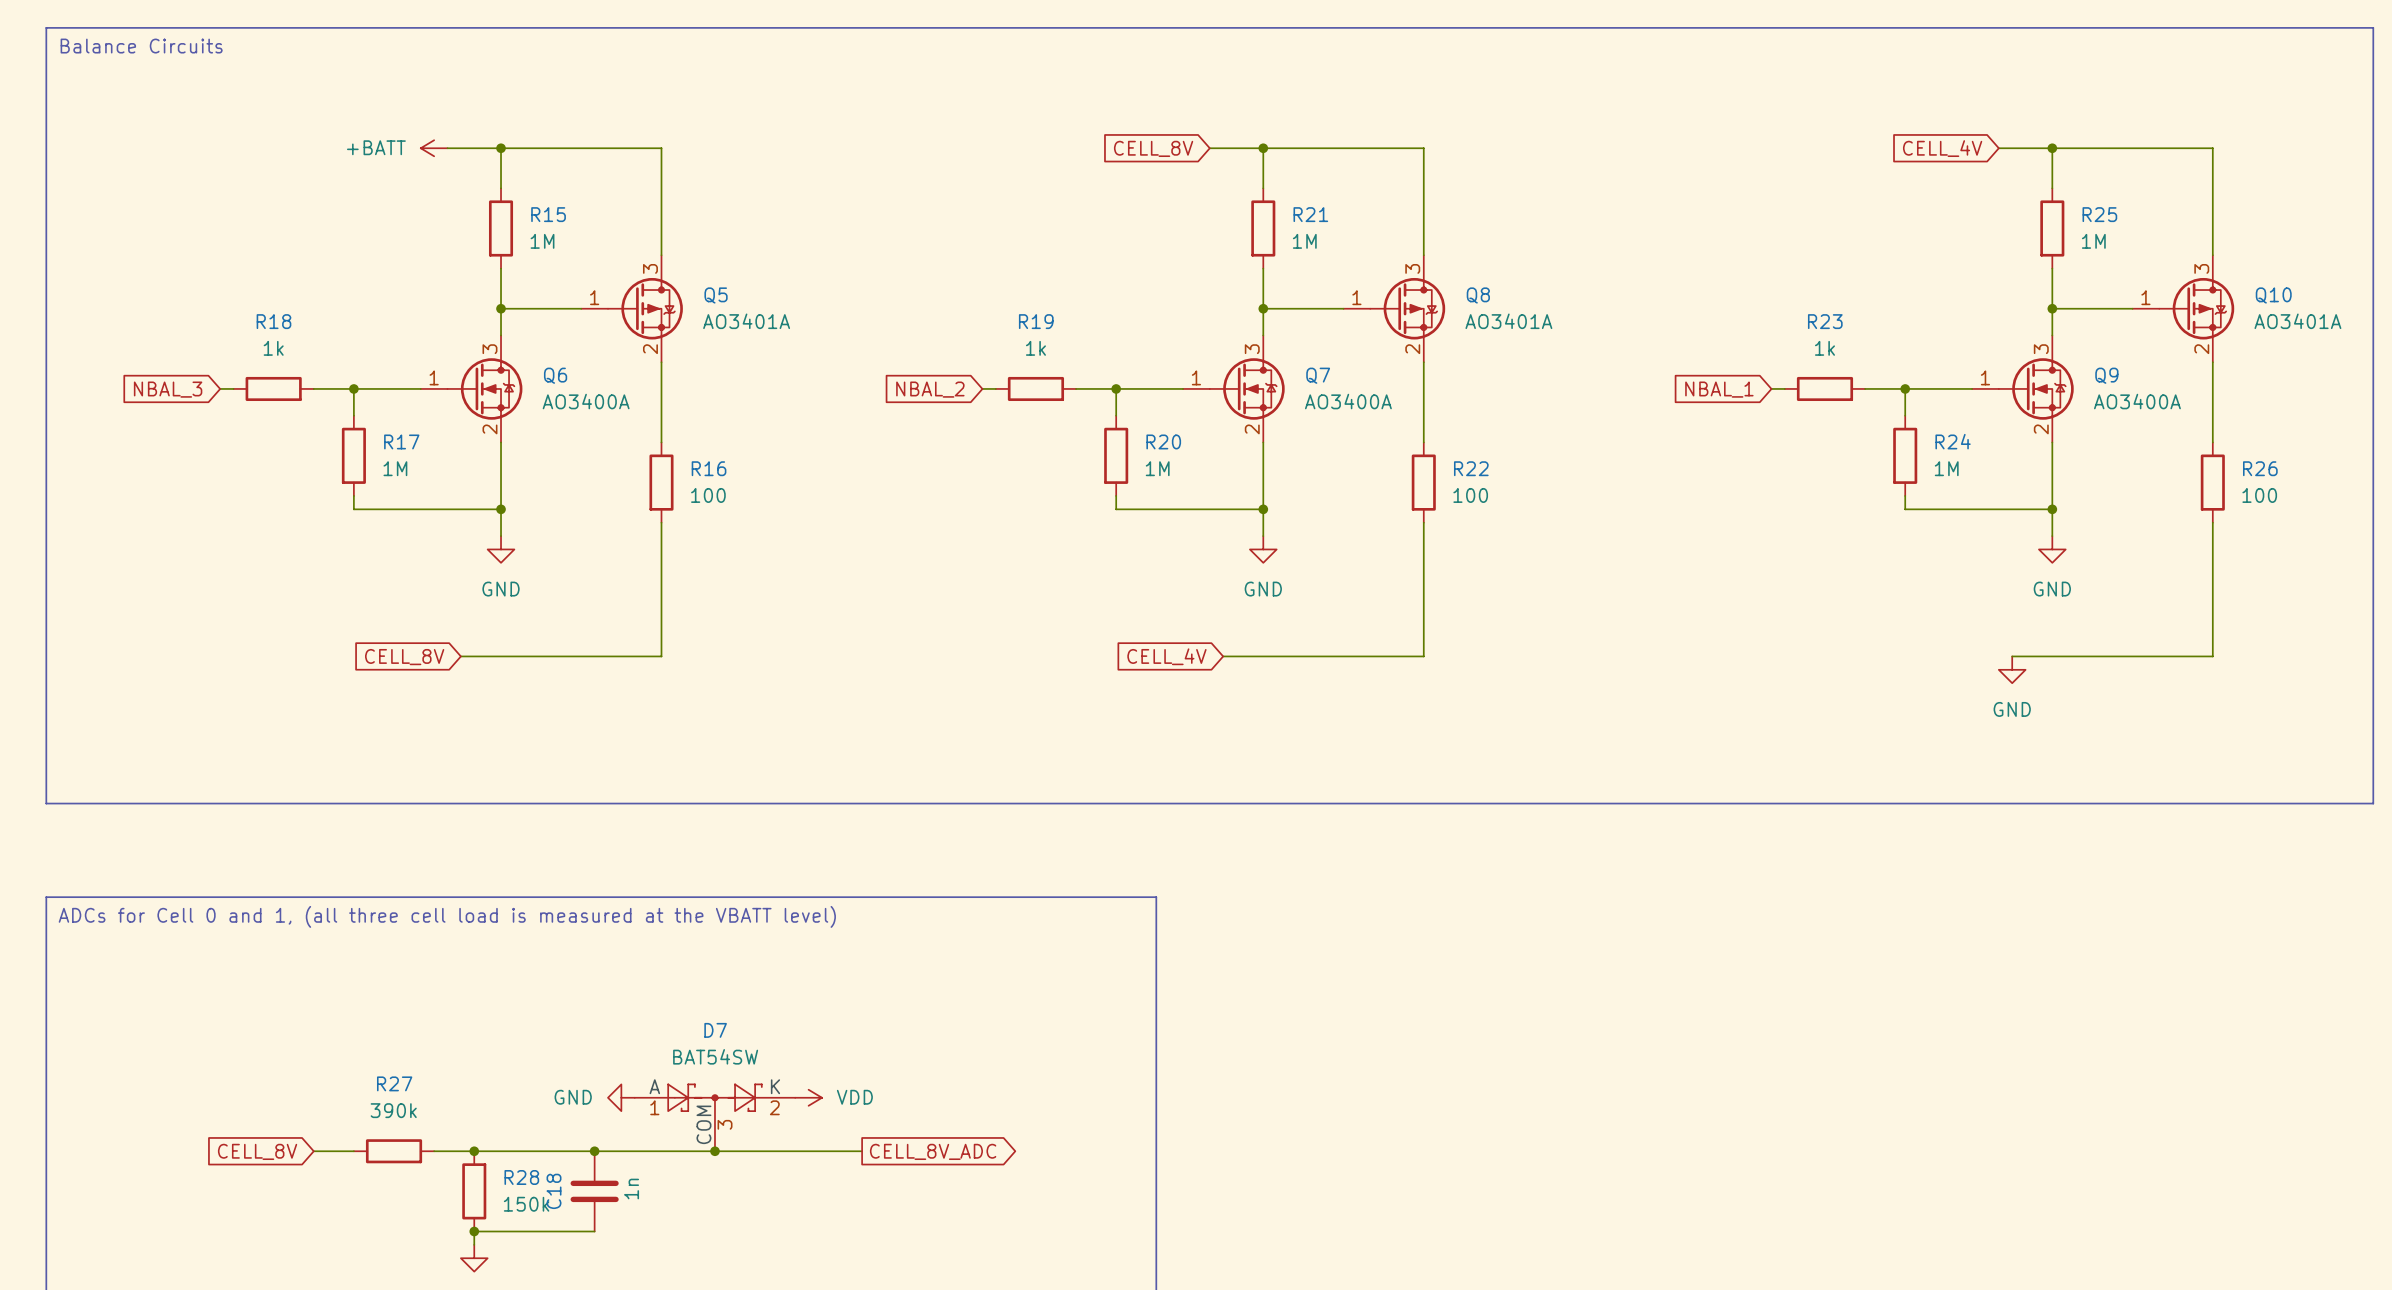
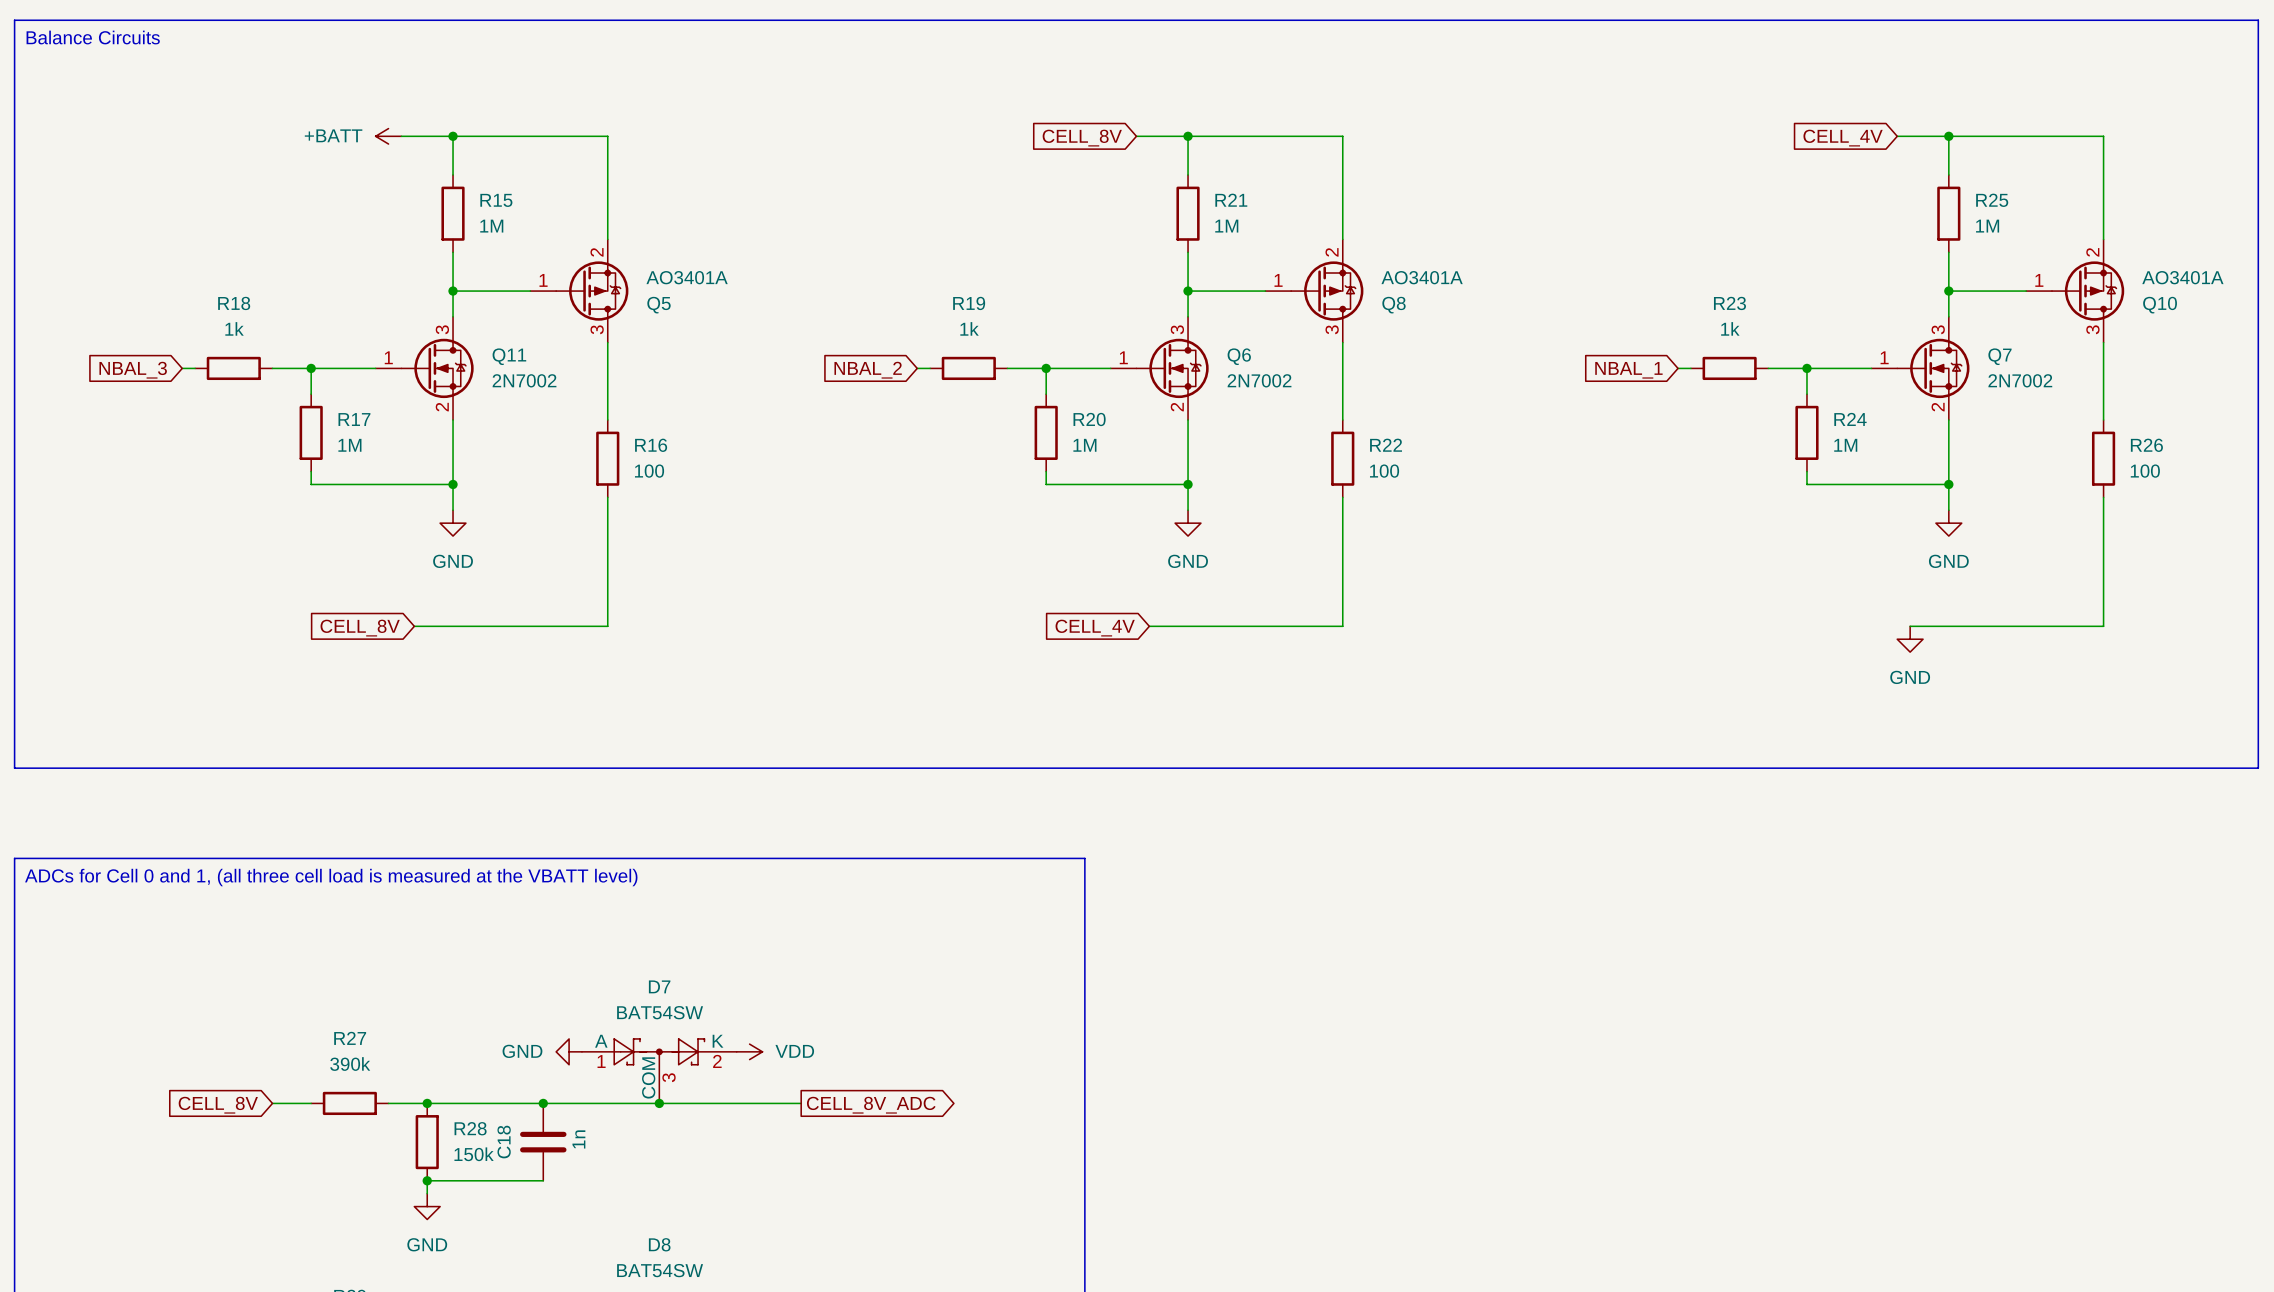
Q5 flip: as is (645, 308) -> up-down (592, 291)
Q8 flip: as is (1407, 308) -> up-down (1327, 291)
Q10 flip: as is (2196, 308) -> up-down (2088, 291)
Q6 name: Q6 (555, 375) -> Q11 (509, 356)
Q7 name: Q7 (1318, 375) -> Q6 (1239, 356)
Q9 name: Q9 (2106, 375) -> Q7 (1999, 356)
Q6 value: AO3400A (586, 401) -> 2N7002 (524, 380)
Q7 value: AO3400A (1348, 401) -> 2N7002 (1259, 380)
Q9 value: AO3400A (2137, 401) -> 2N7002 (2020, 380)

